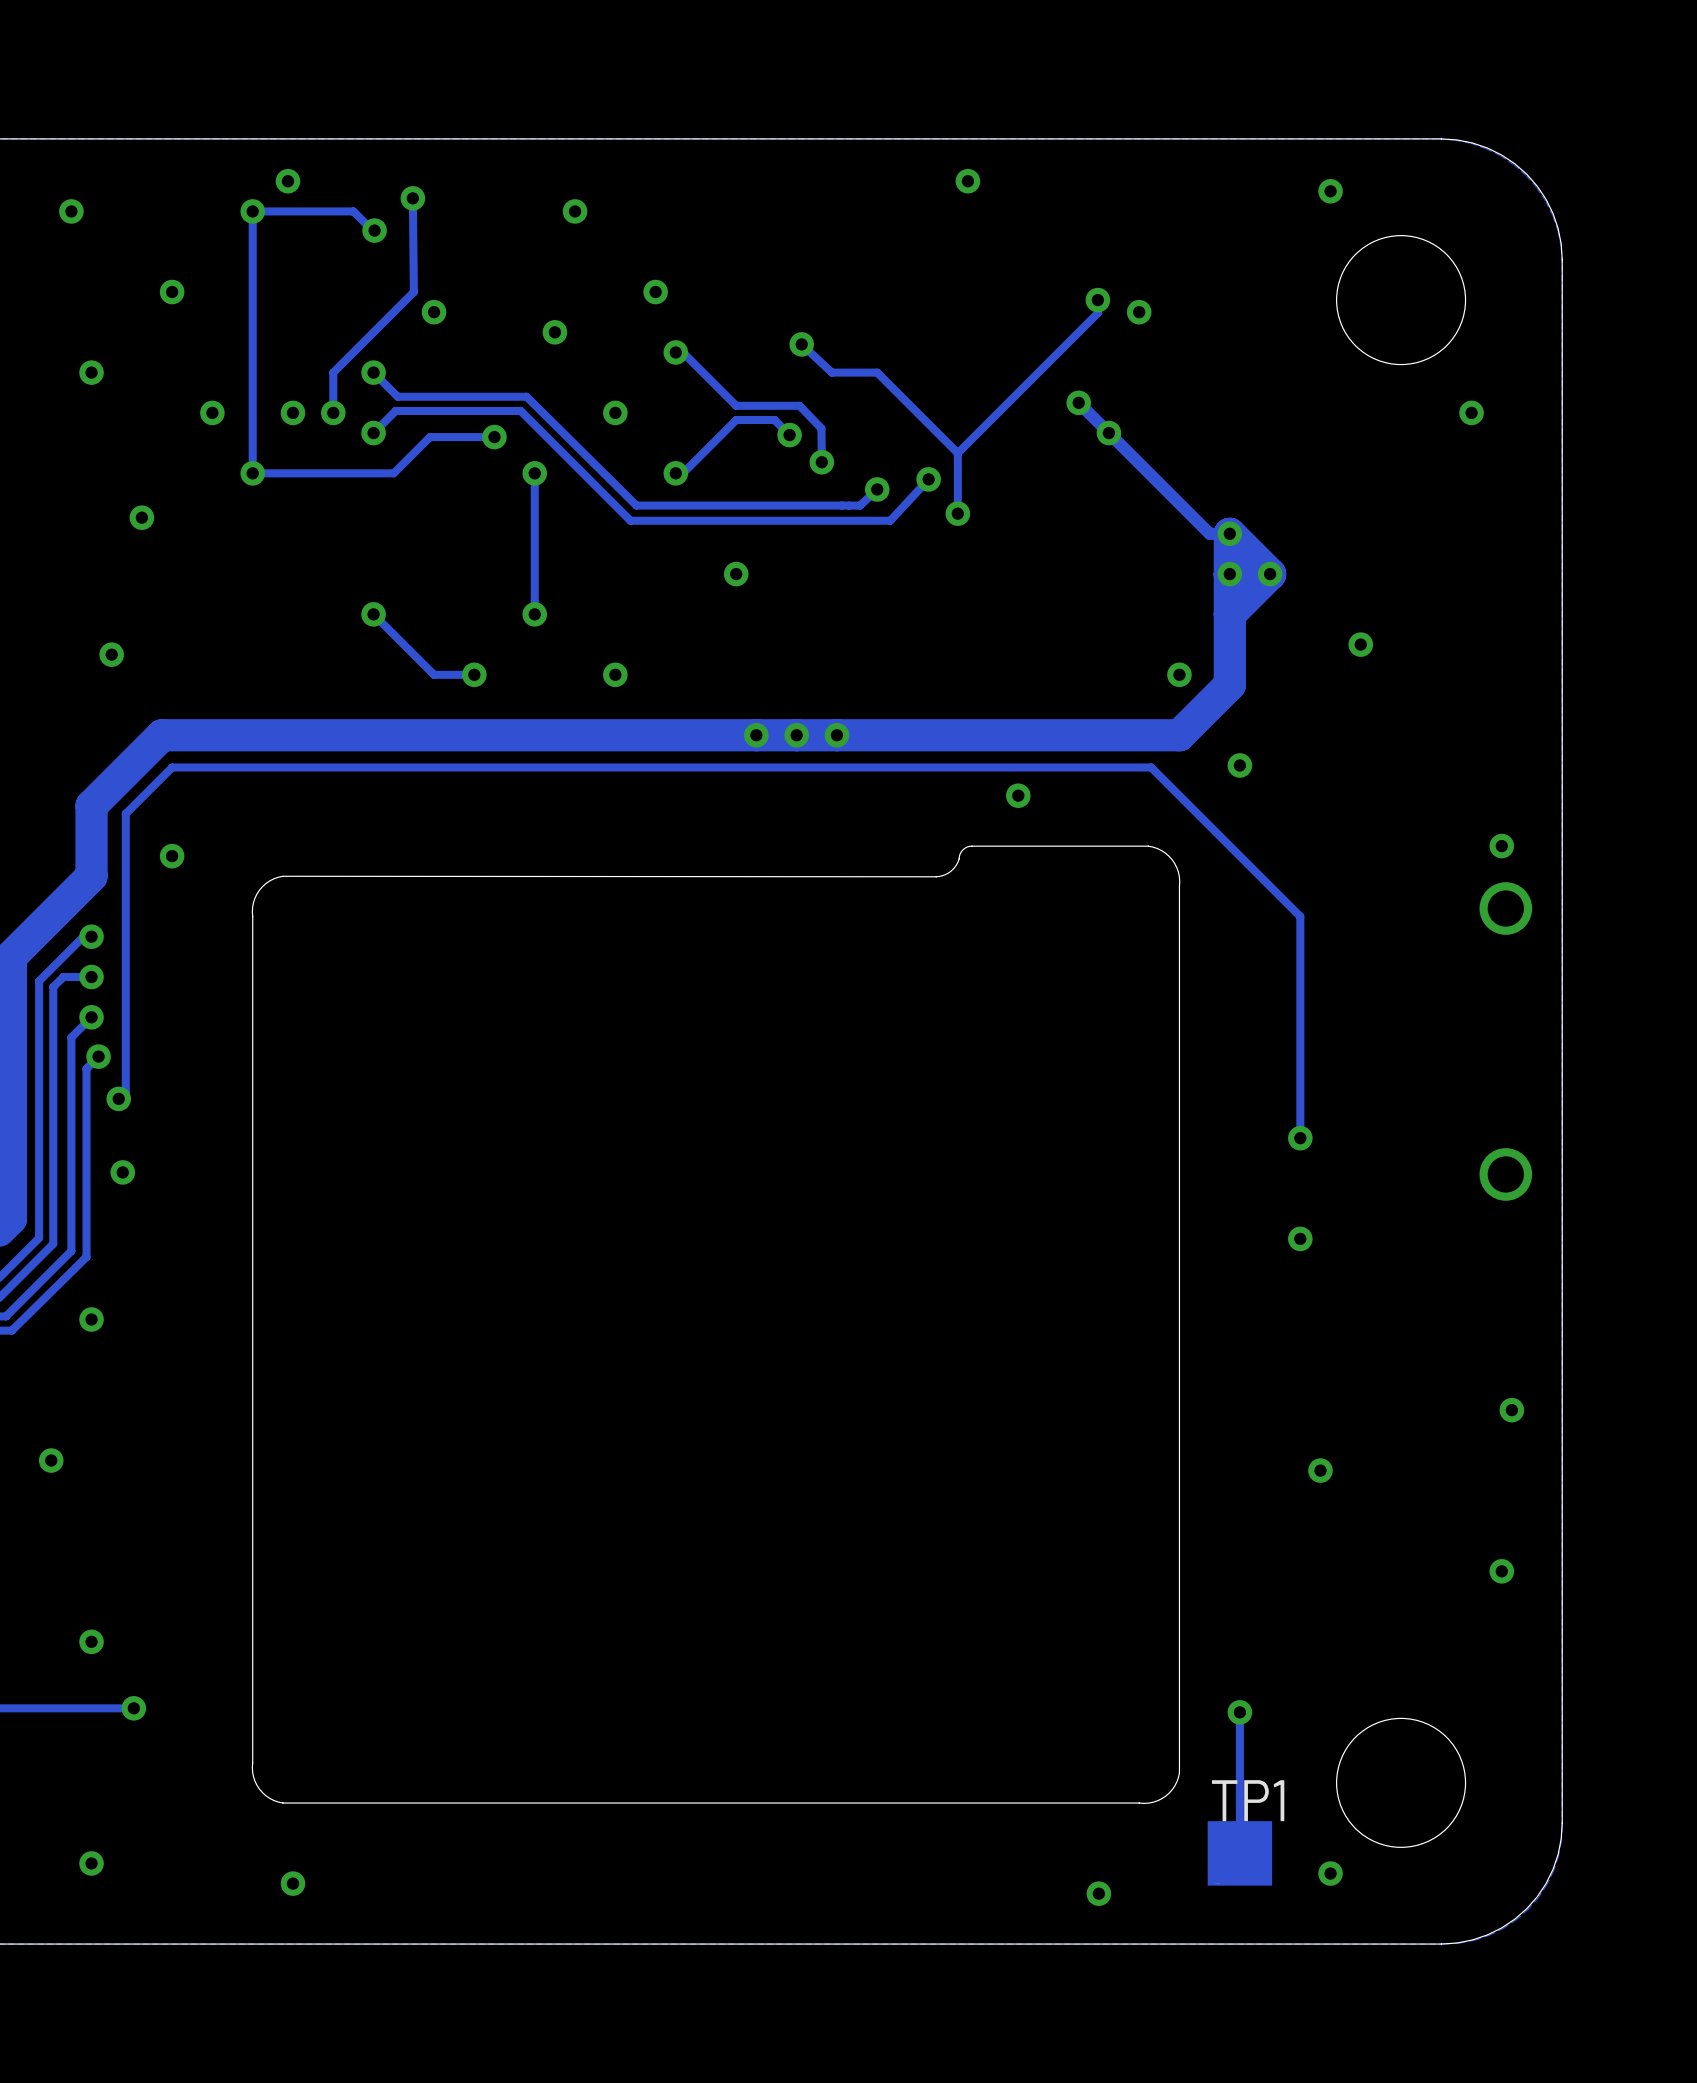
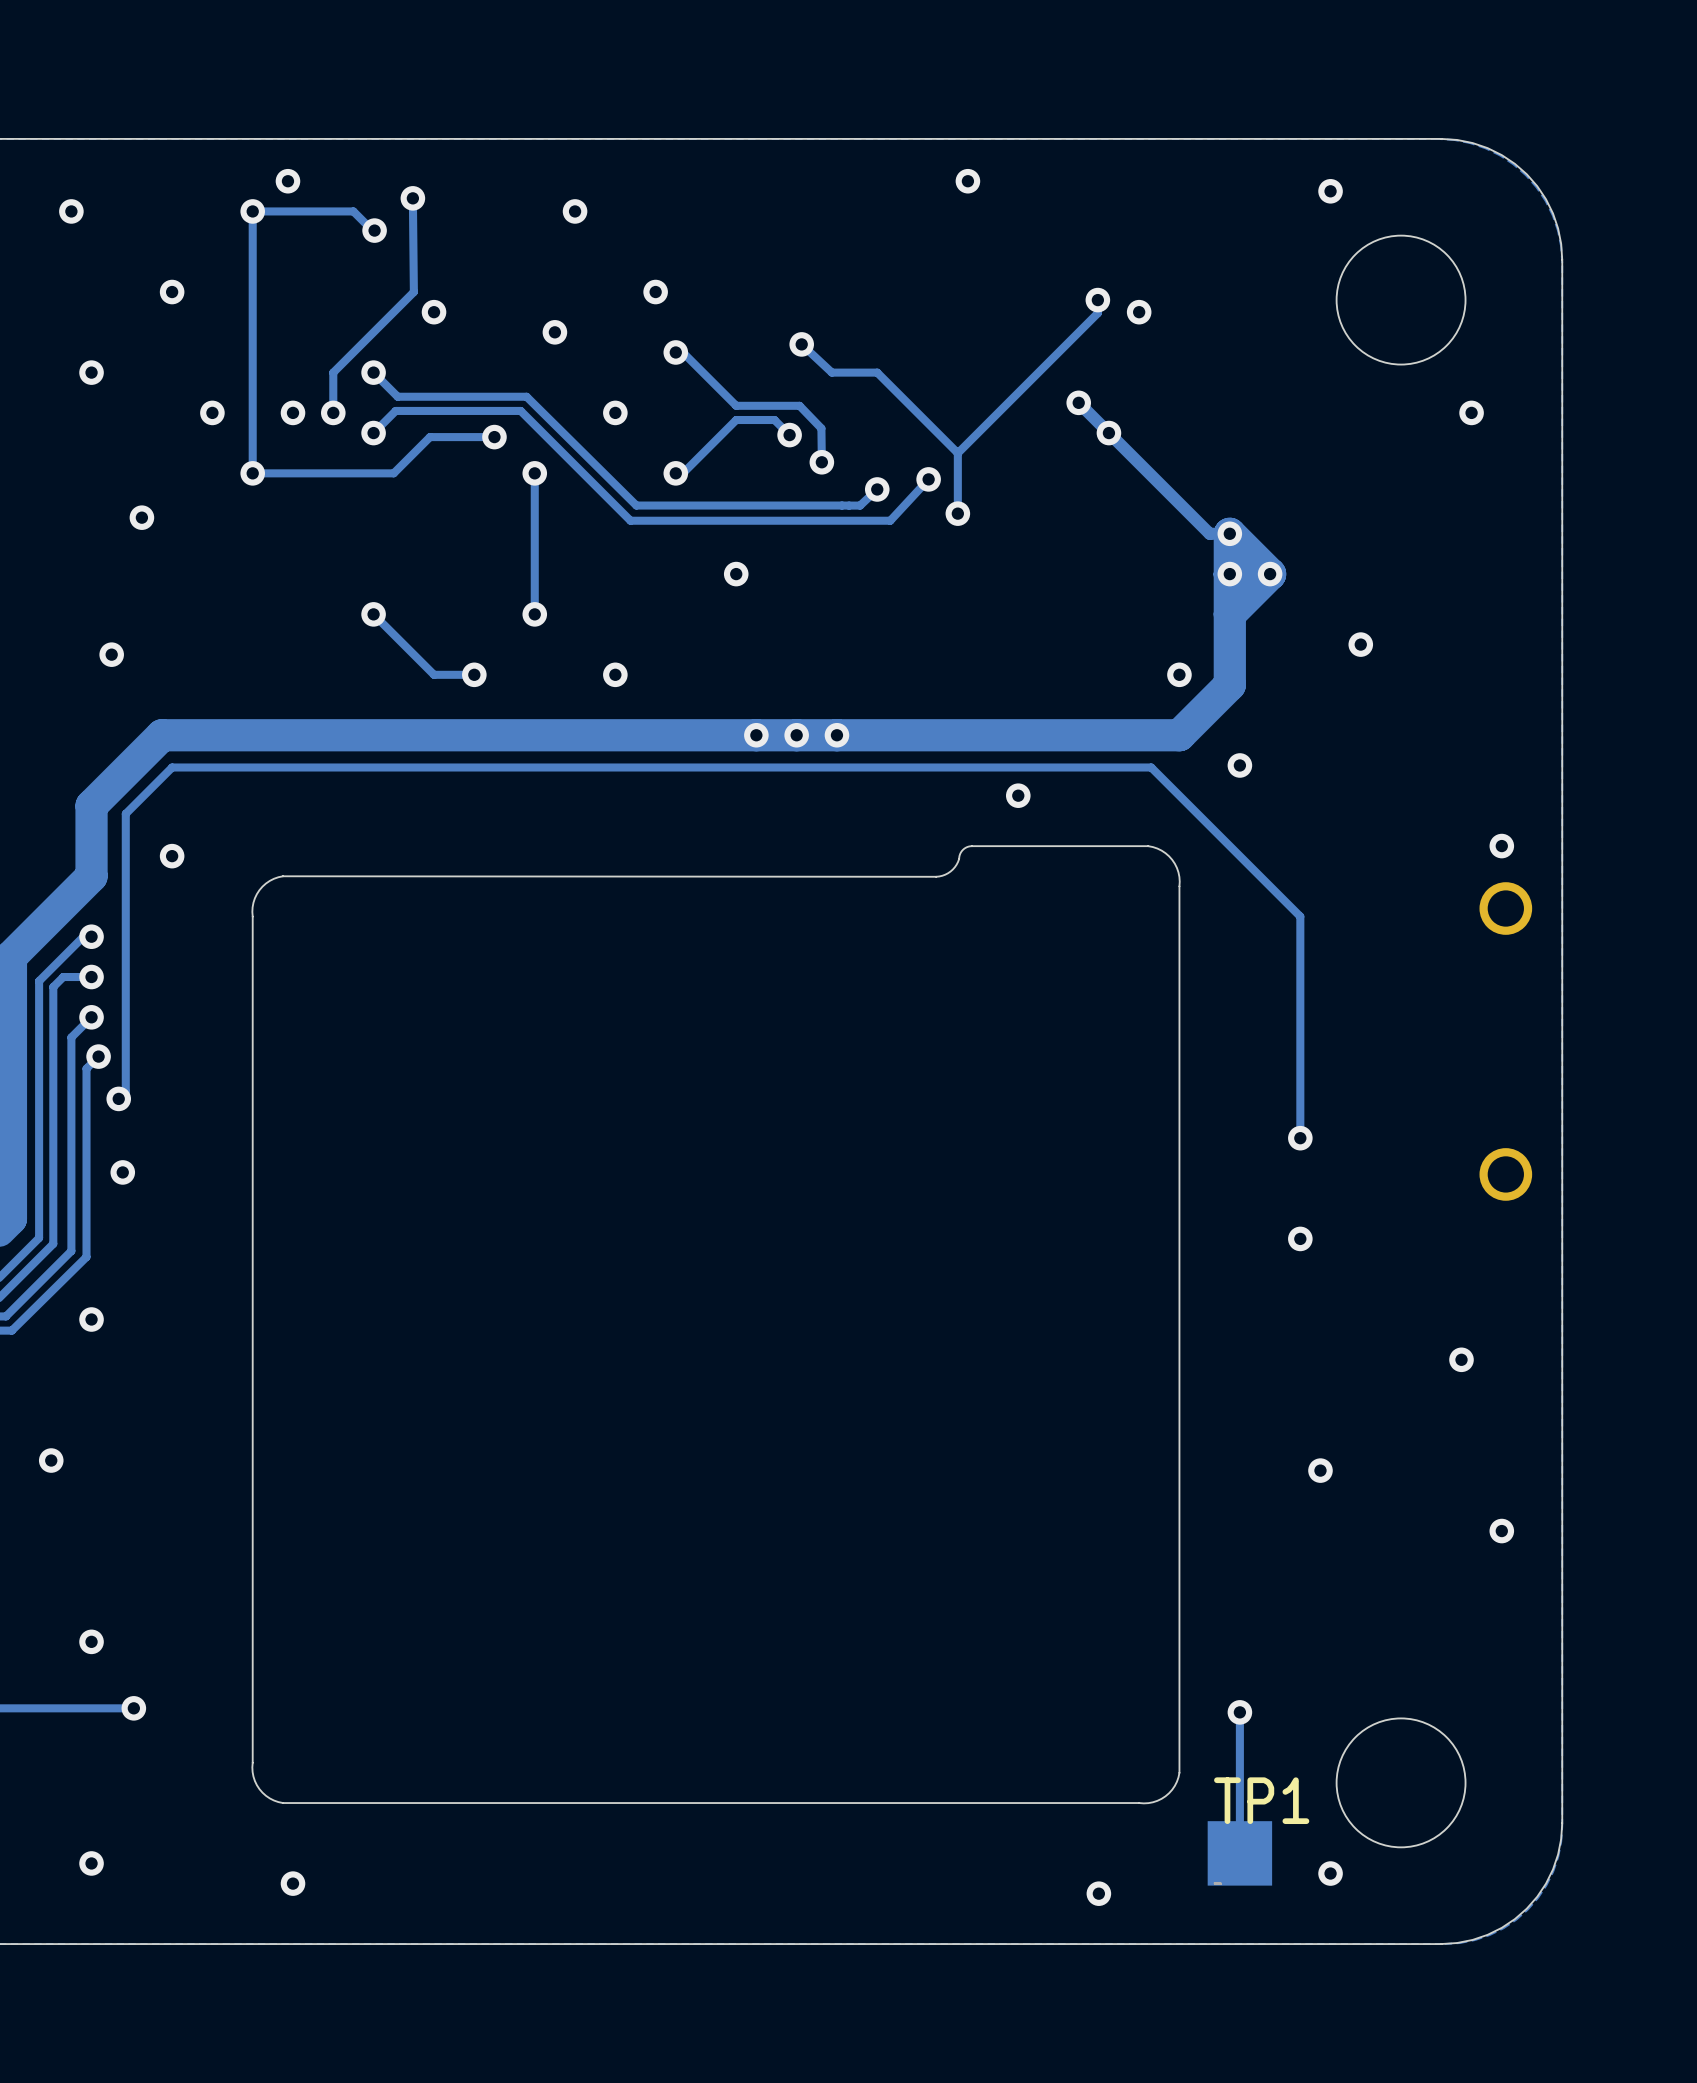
via: none -> (1461, 1359)
via: (1511, 1410) -> none
via position: (1501, 1571) -> (1501, 1531)

